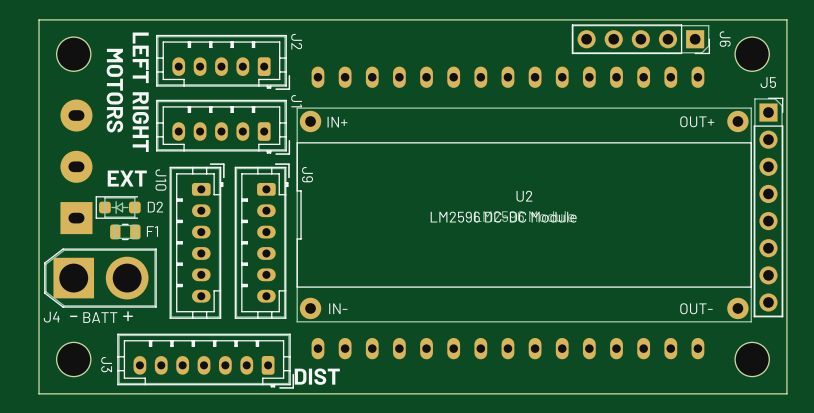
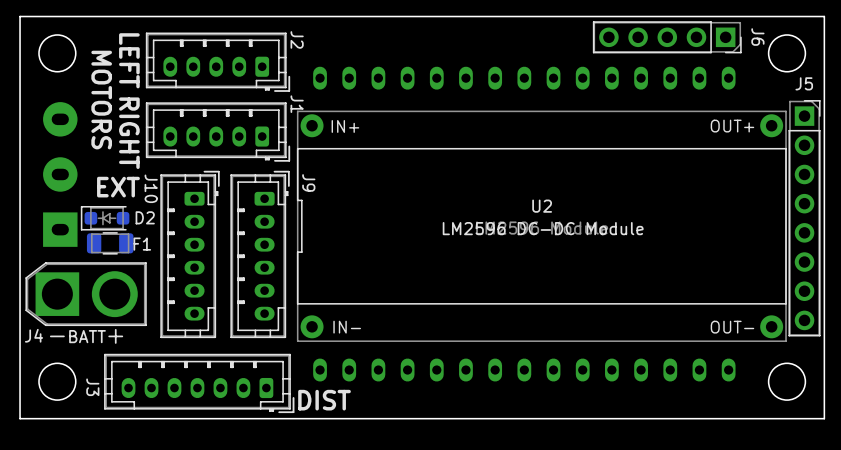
F1 footprint: [110, 223, 141, 241] -> [86, 232, 134, 255]

